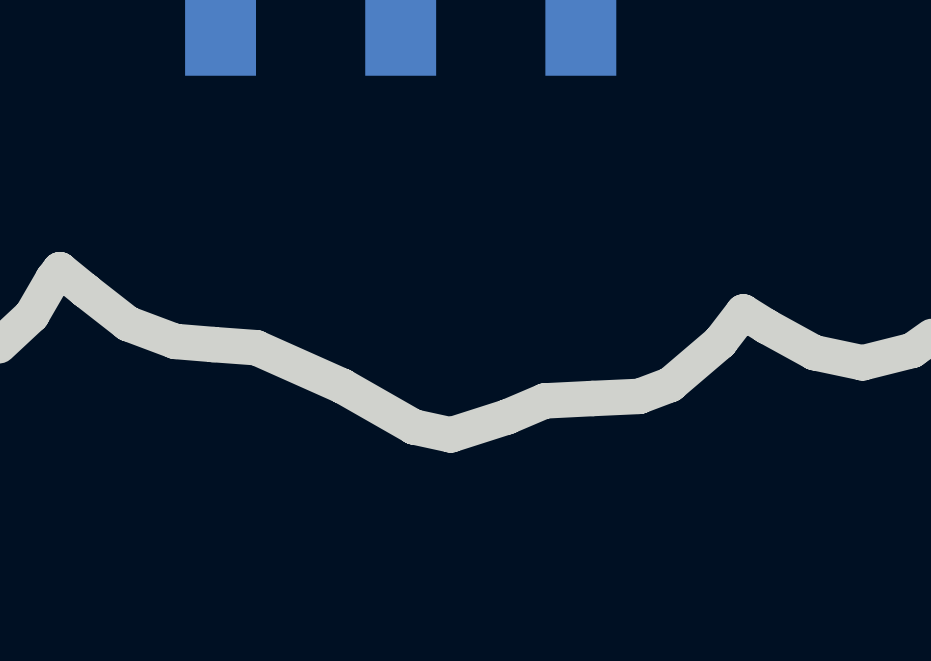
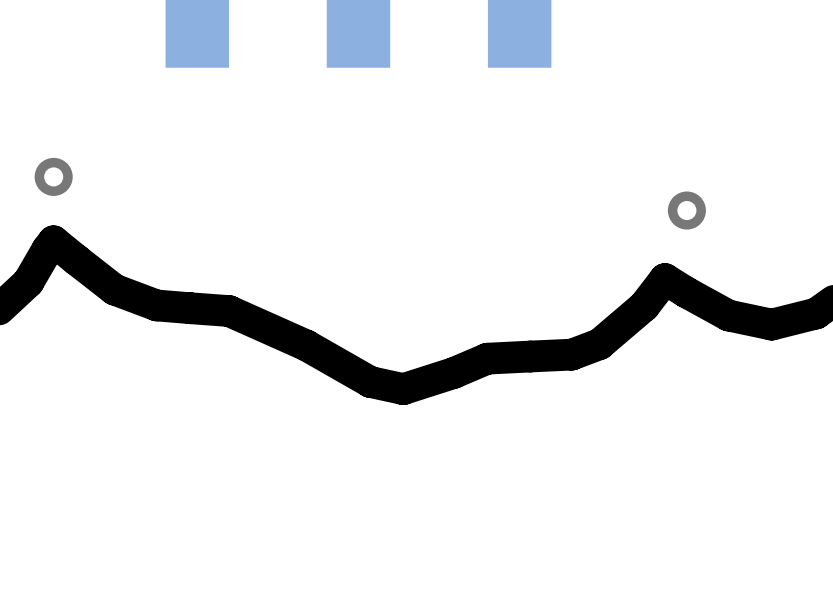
via: none -> (53, 176)
via: none -> (686, 210)

